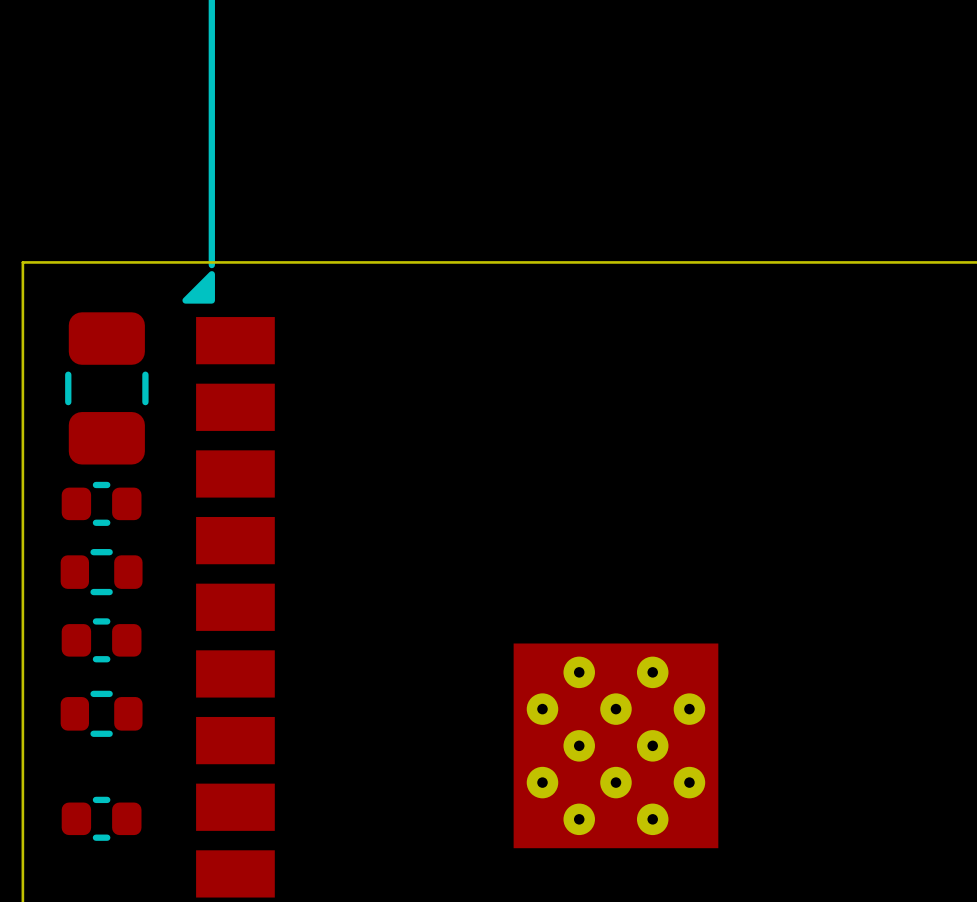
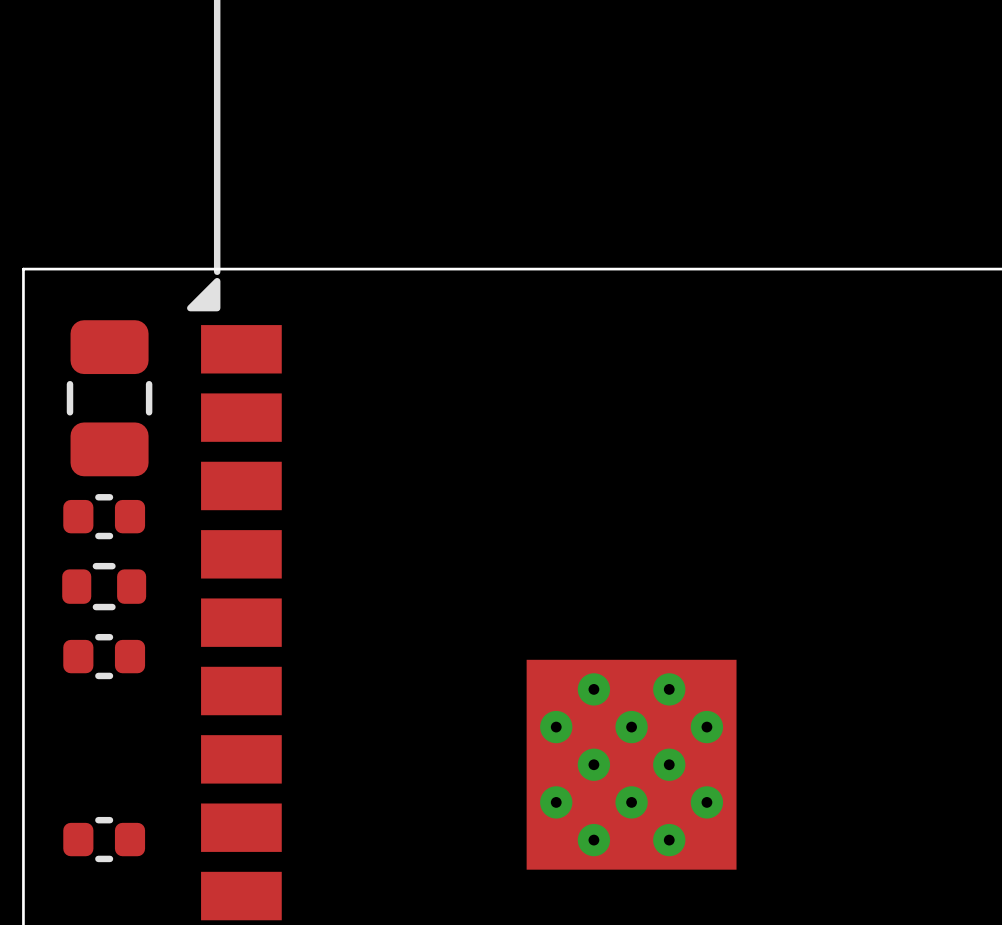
part: (101, 713) -> none

